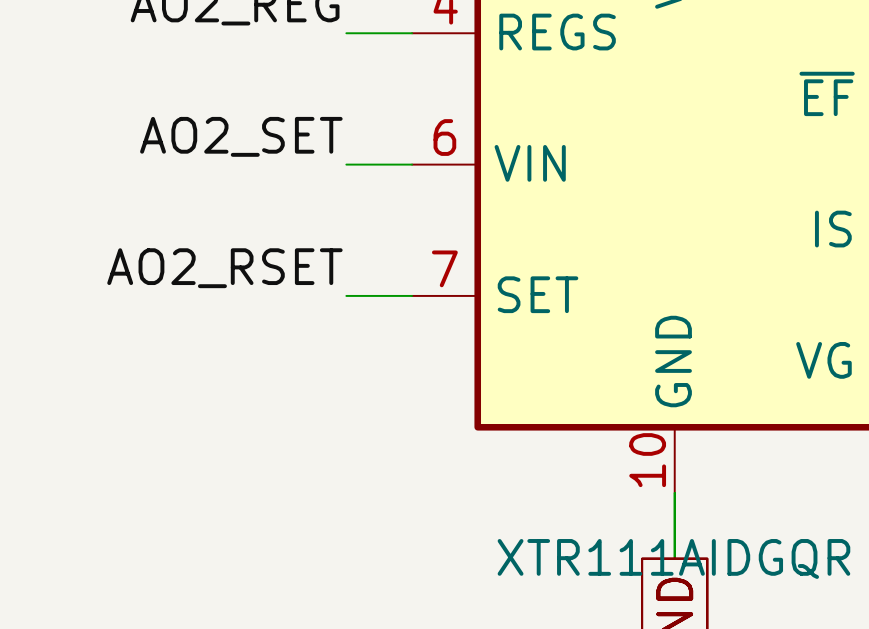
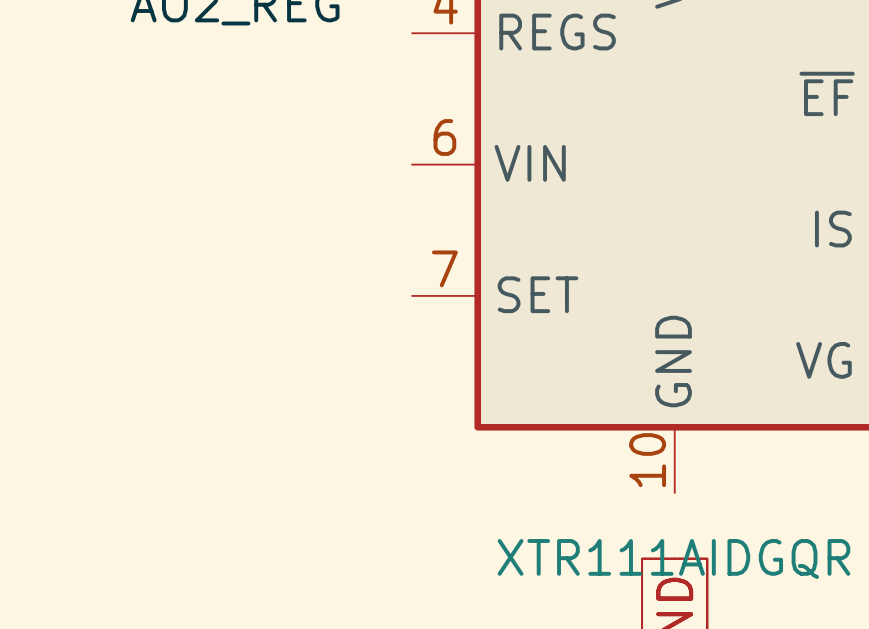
wire: (346, 33) (412, 33) -> none
label: AO2_SET (241, 136) -> none
wire: (346, 164) (412, 164) -> none
label: AO2_RSET (224, 268) -> none
wire: (346, 295) (412, 295) -> none
wire: (674, 492) (674, 558) -> none

